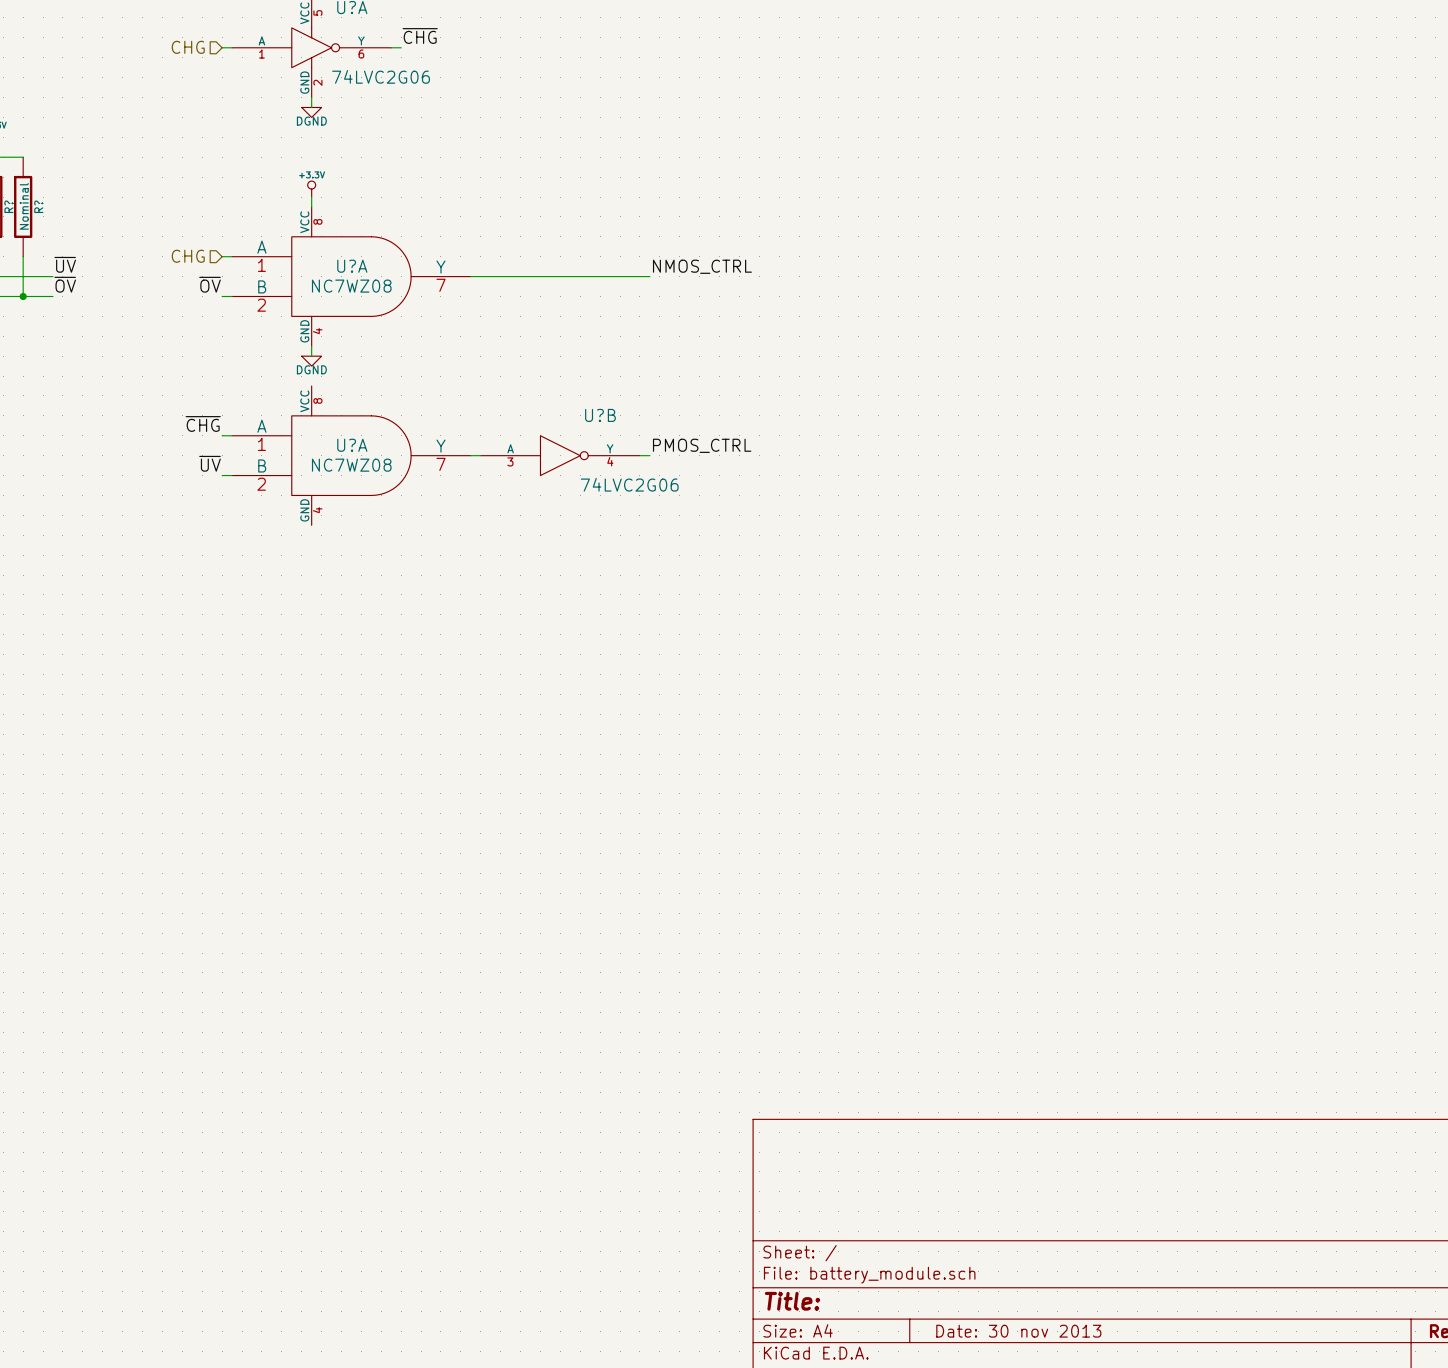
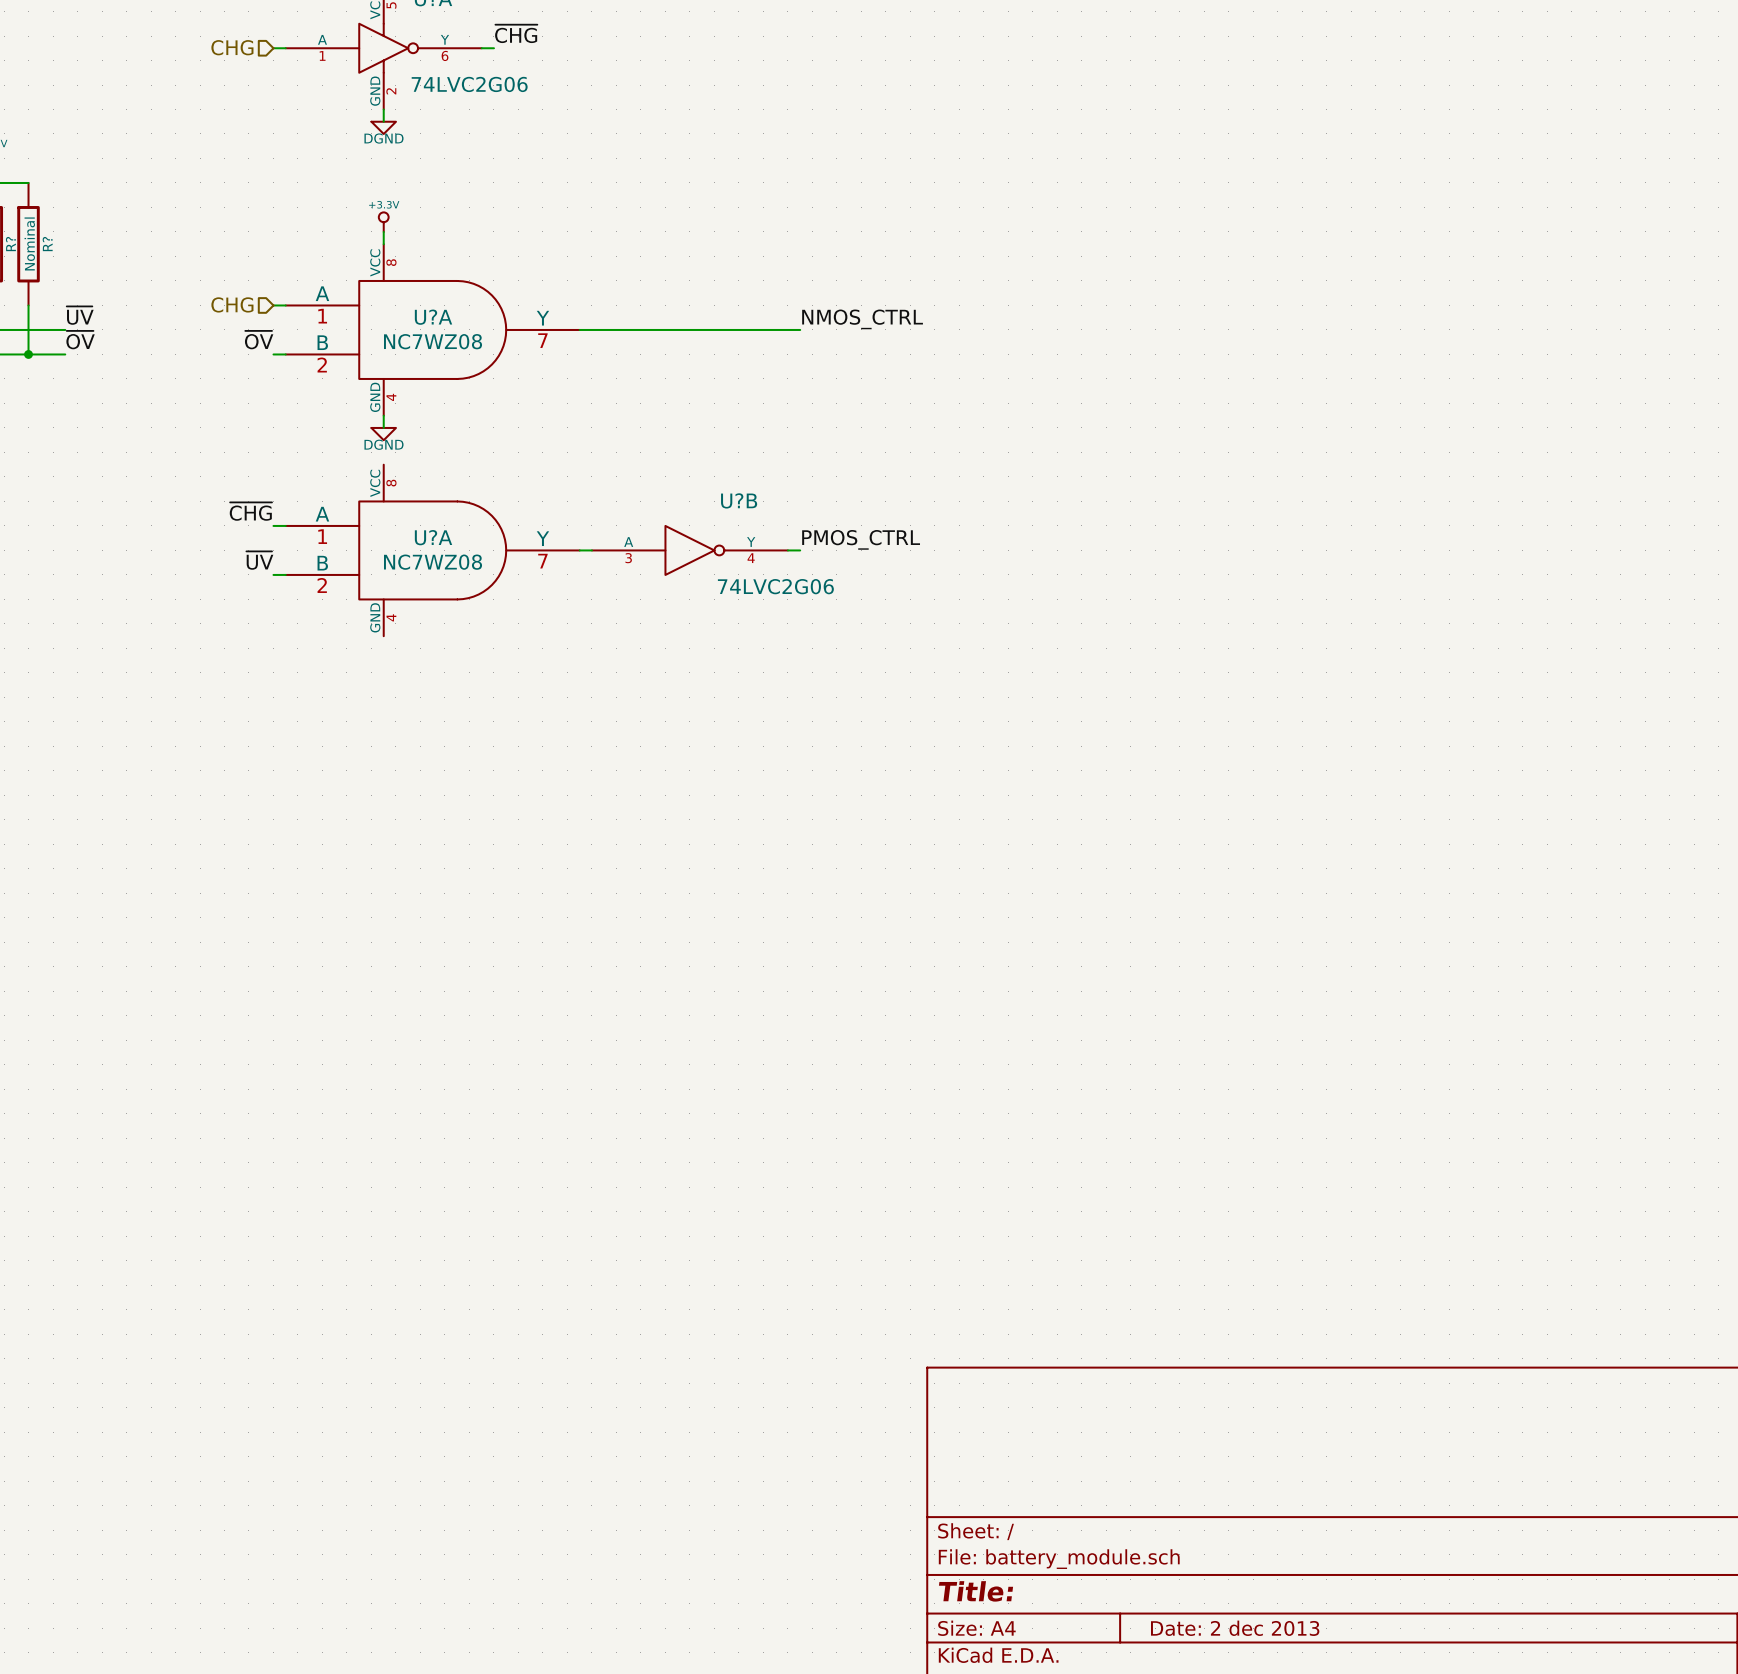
title block: Date: 30 nov 2013 (1018, 1331) -> Date: 2 dec 2013 (1235, 1628)

